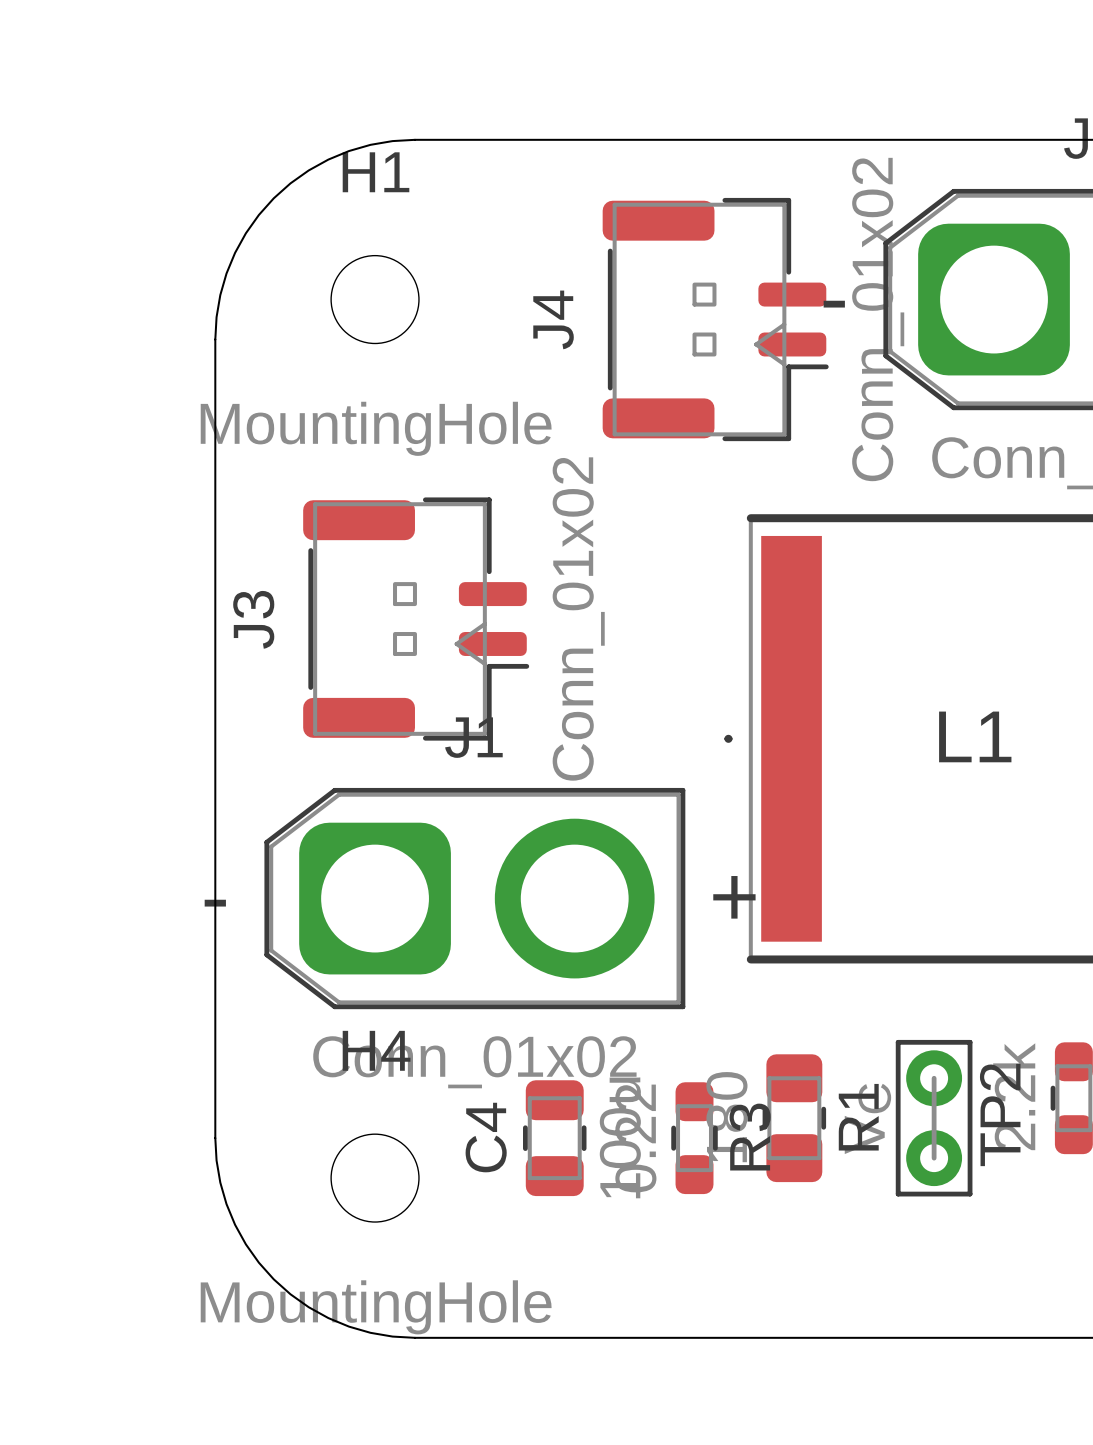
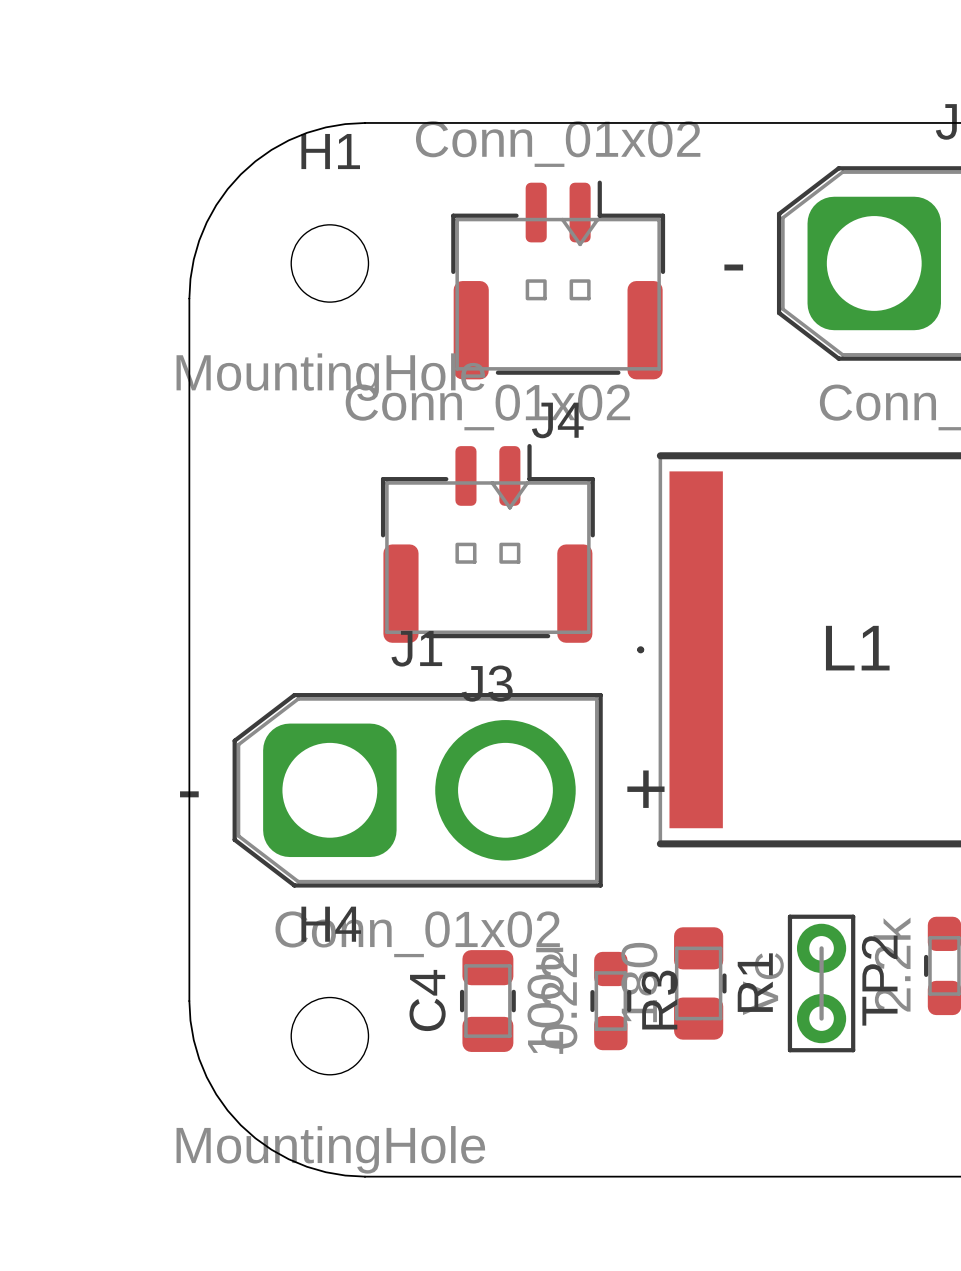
J4 rotation: 0° (715, 319) -> 90° counterclockwise (558, 279)
J3 rotation: 0° (416, 619) -> 90° counterclockwise (487, 543)

